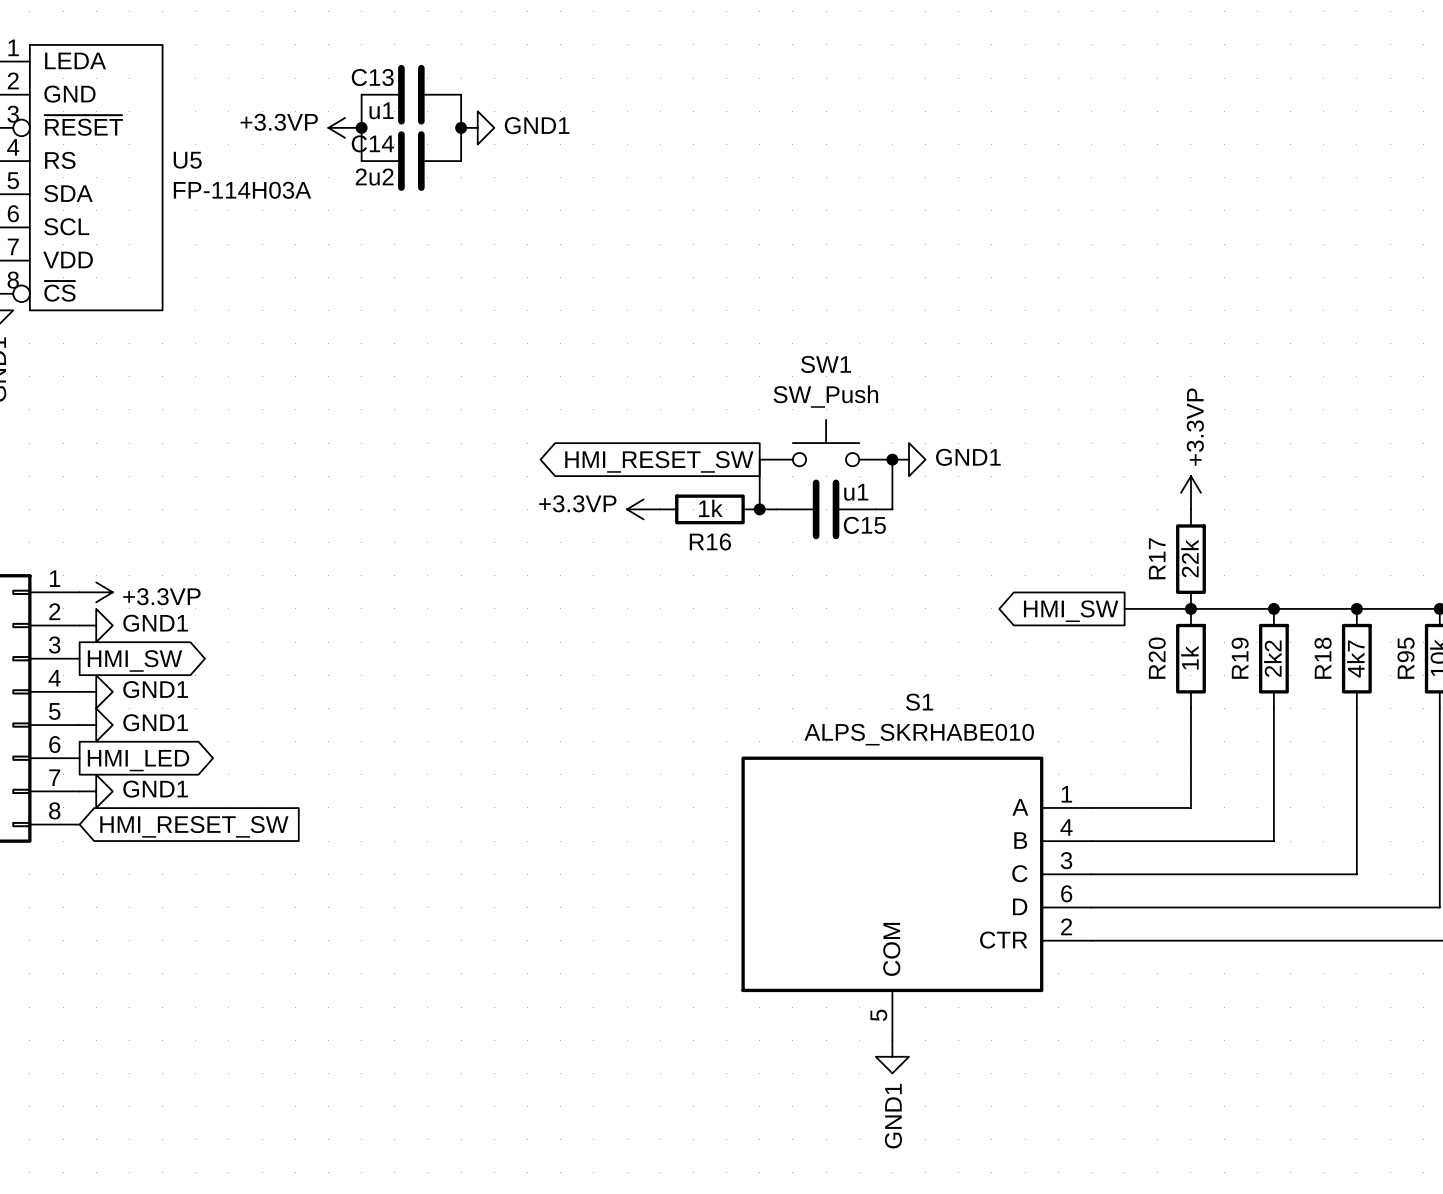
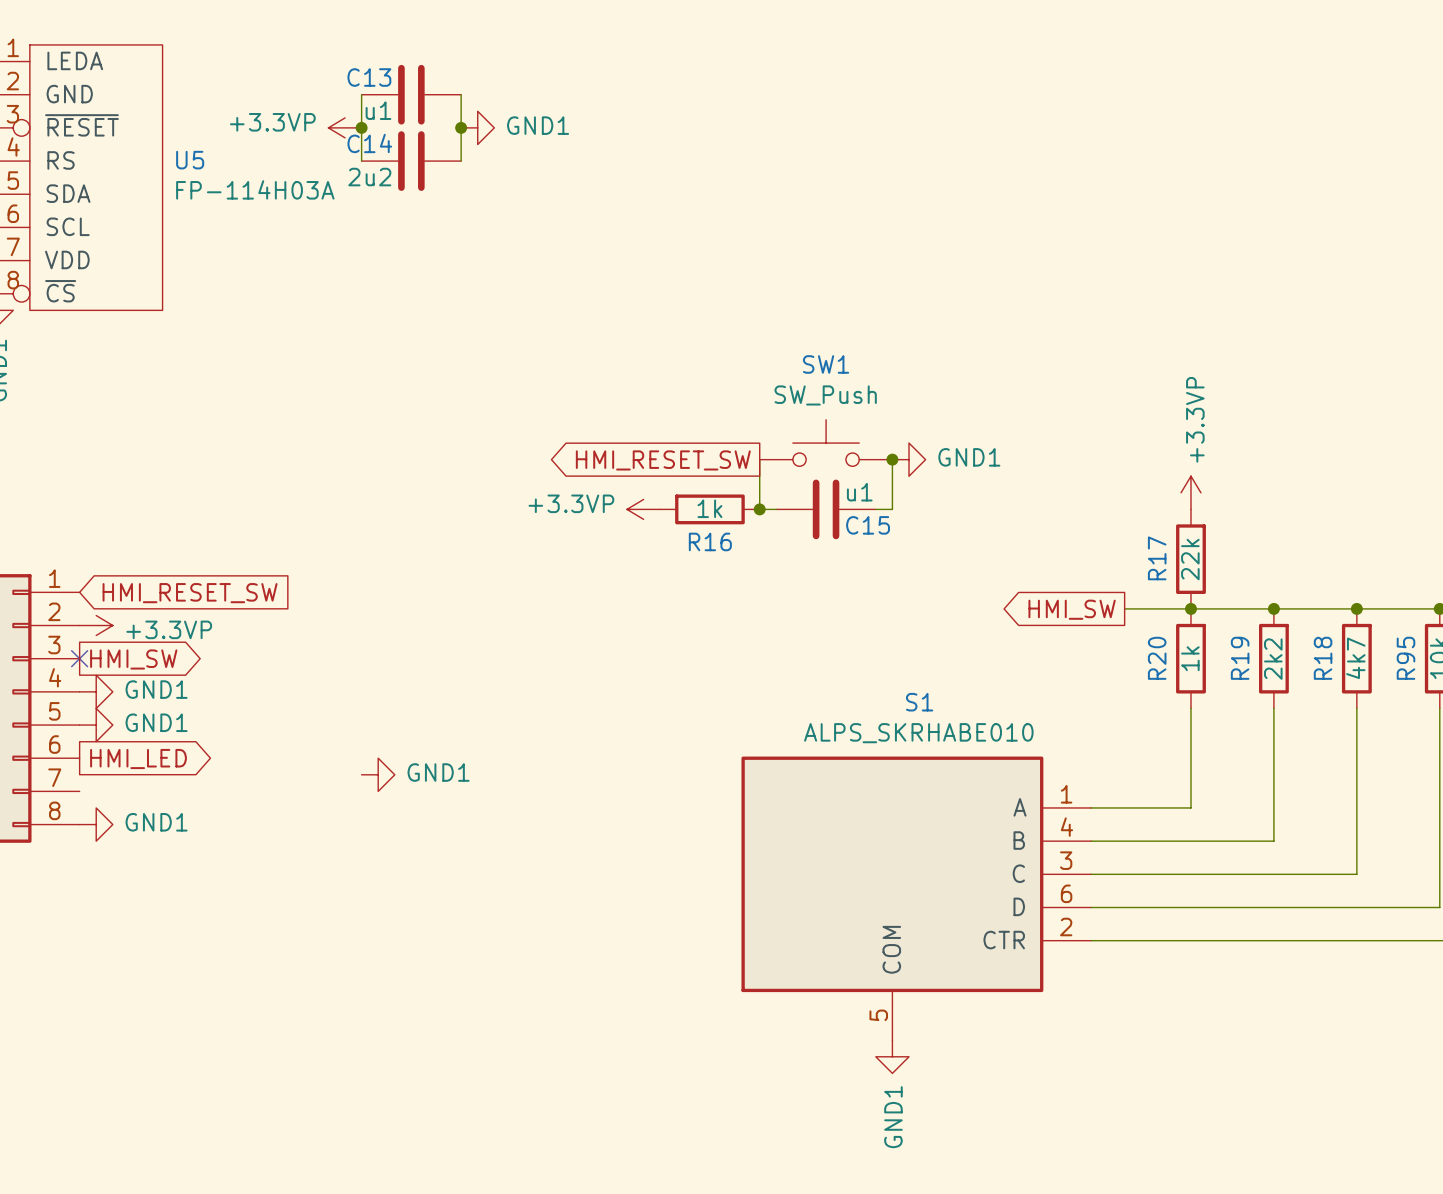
power symbol: +3.3VP (96, 592) -> none
power symbol: GND1 (96, 625) -> +3.3VP (96, 625)
no-connect mark: none -> (79, 658)
power symbol: none -> GND1 (378, 774)
power symbol position: GND1 (96, 791) -> GND1 (96, 824)
global label position: HMI_RESET_SW (194, 826) -> HMI_RESET_SW (190, 593)

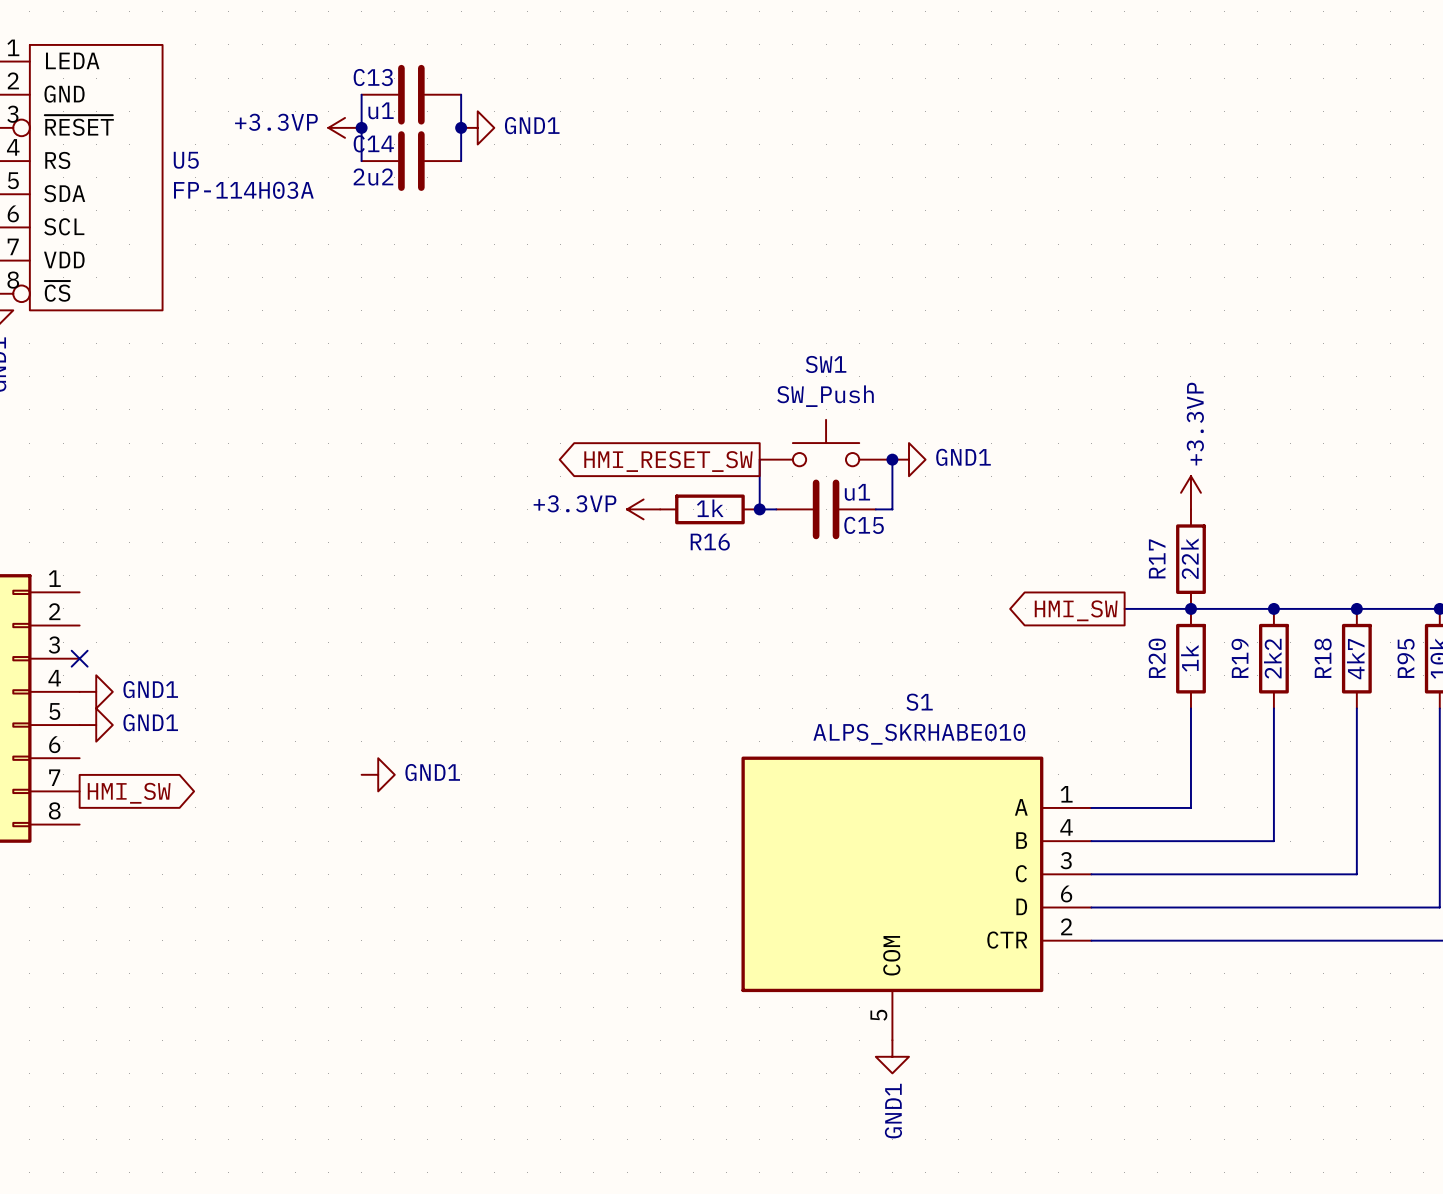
global label: HMI_RESET_SW (190, 593) -> none
power symbol: +3.3VP (96, 625) -> none
global label position: HMI_SW (133, 659) -> HMI_SW (129, 793)
global label: HMI_LED (138, 759) -> none
power symbol: GND1 (96, 824) -> none

